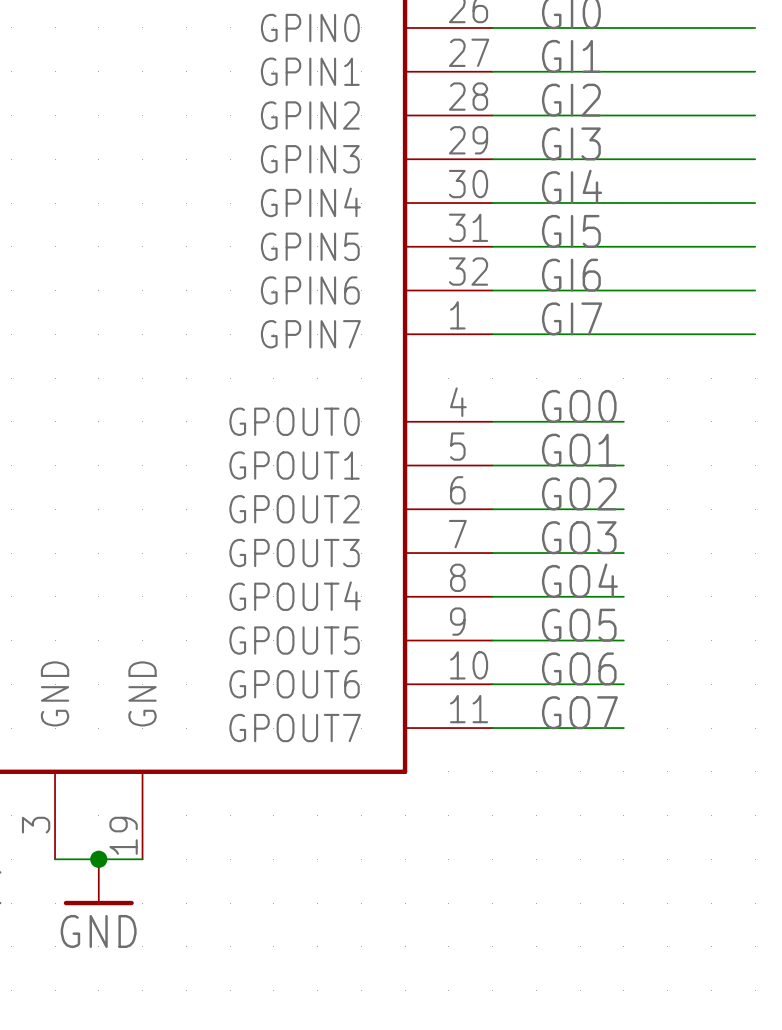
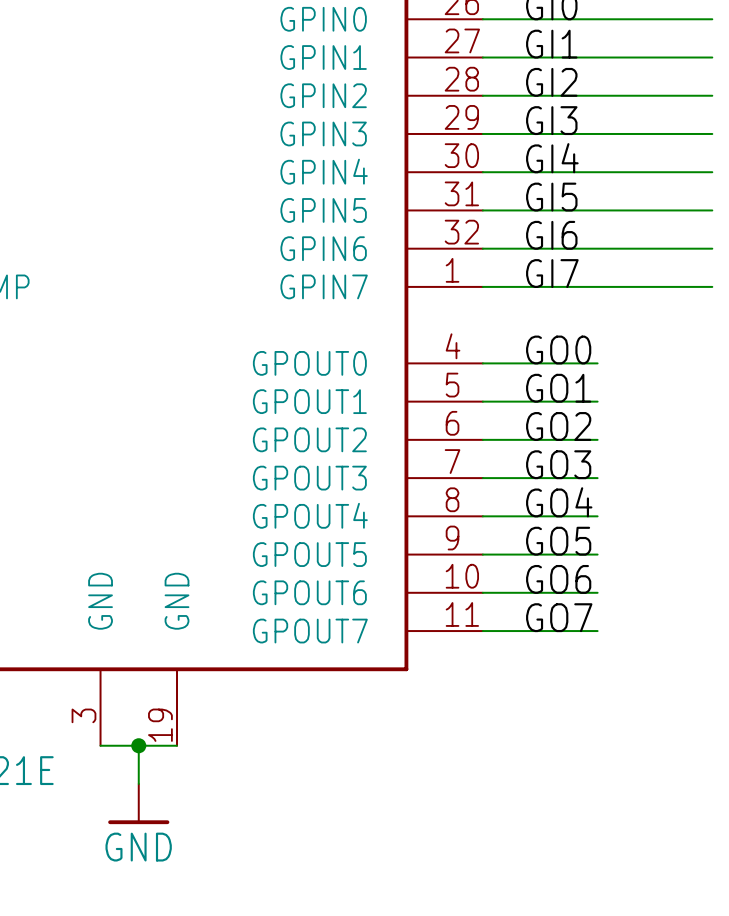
power symbol position: GND (98, 882) -> GND (138, 804)

